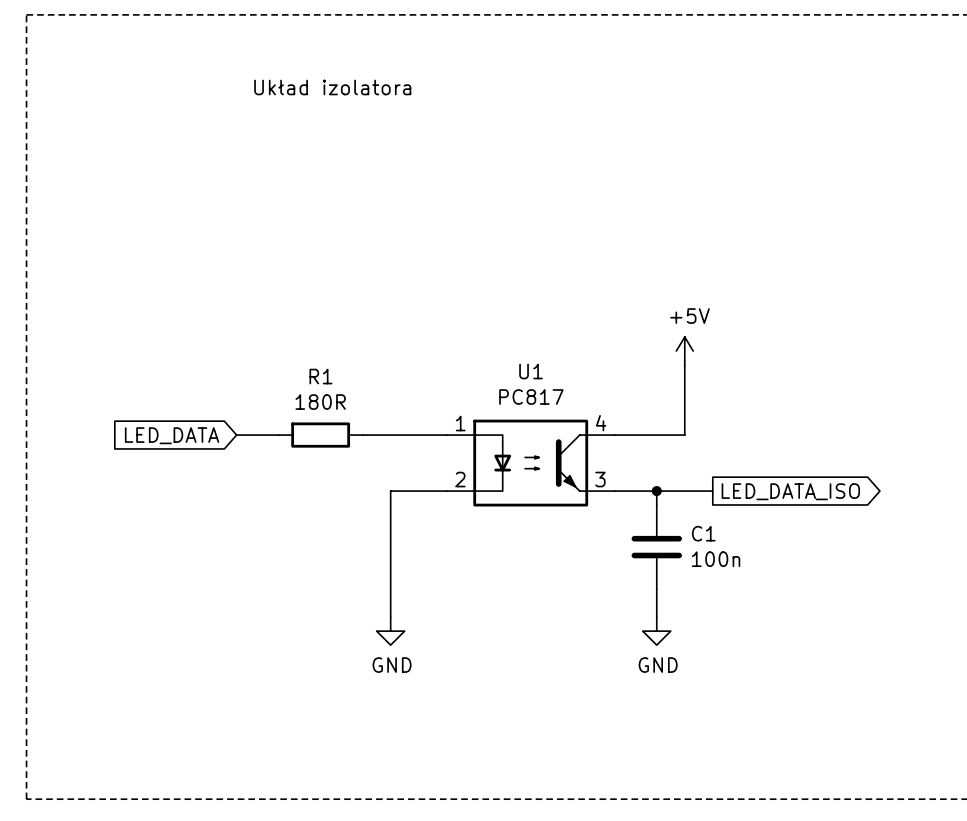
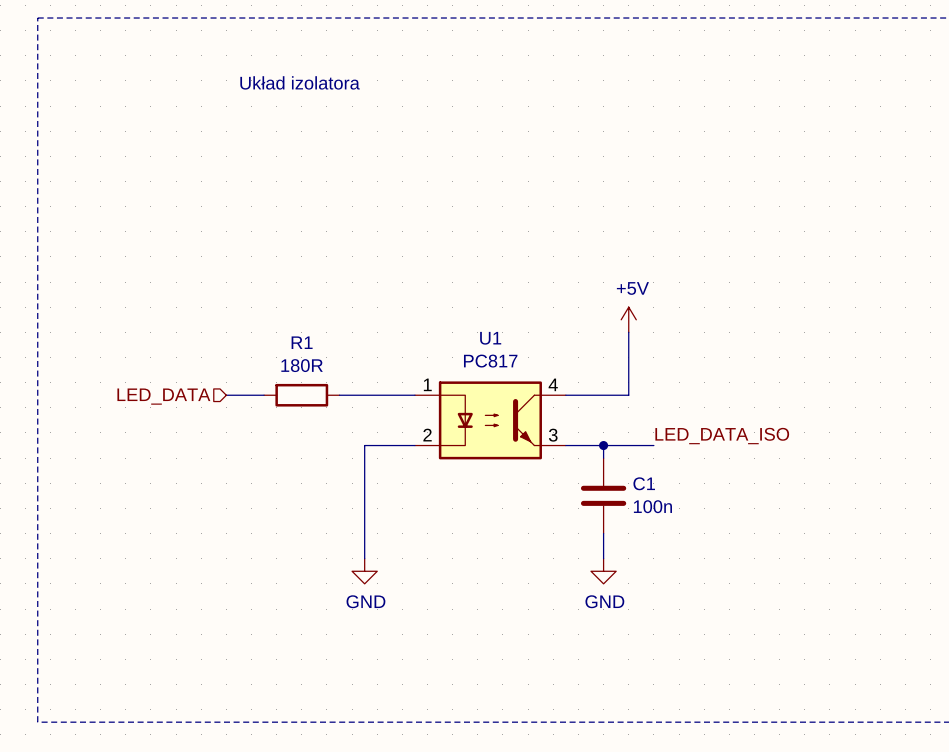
hierarchical label: none -> LED_DATA (163, 396)
global label: LED_DATA (172, 435) -> none
label: none -> LED_DATA_ISO (722, 436)
global label: LED_DATA_ISO (790, 491) -> none

